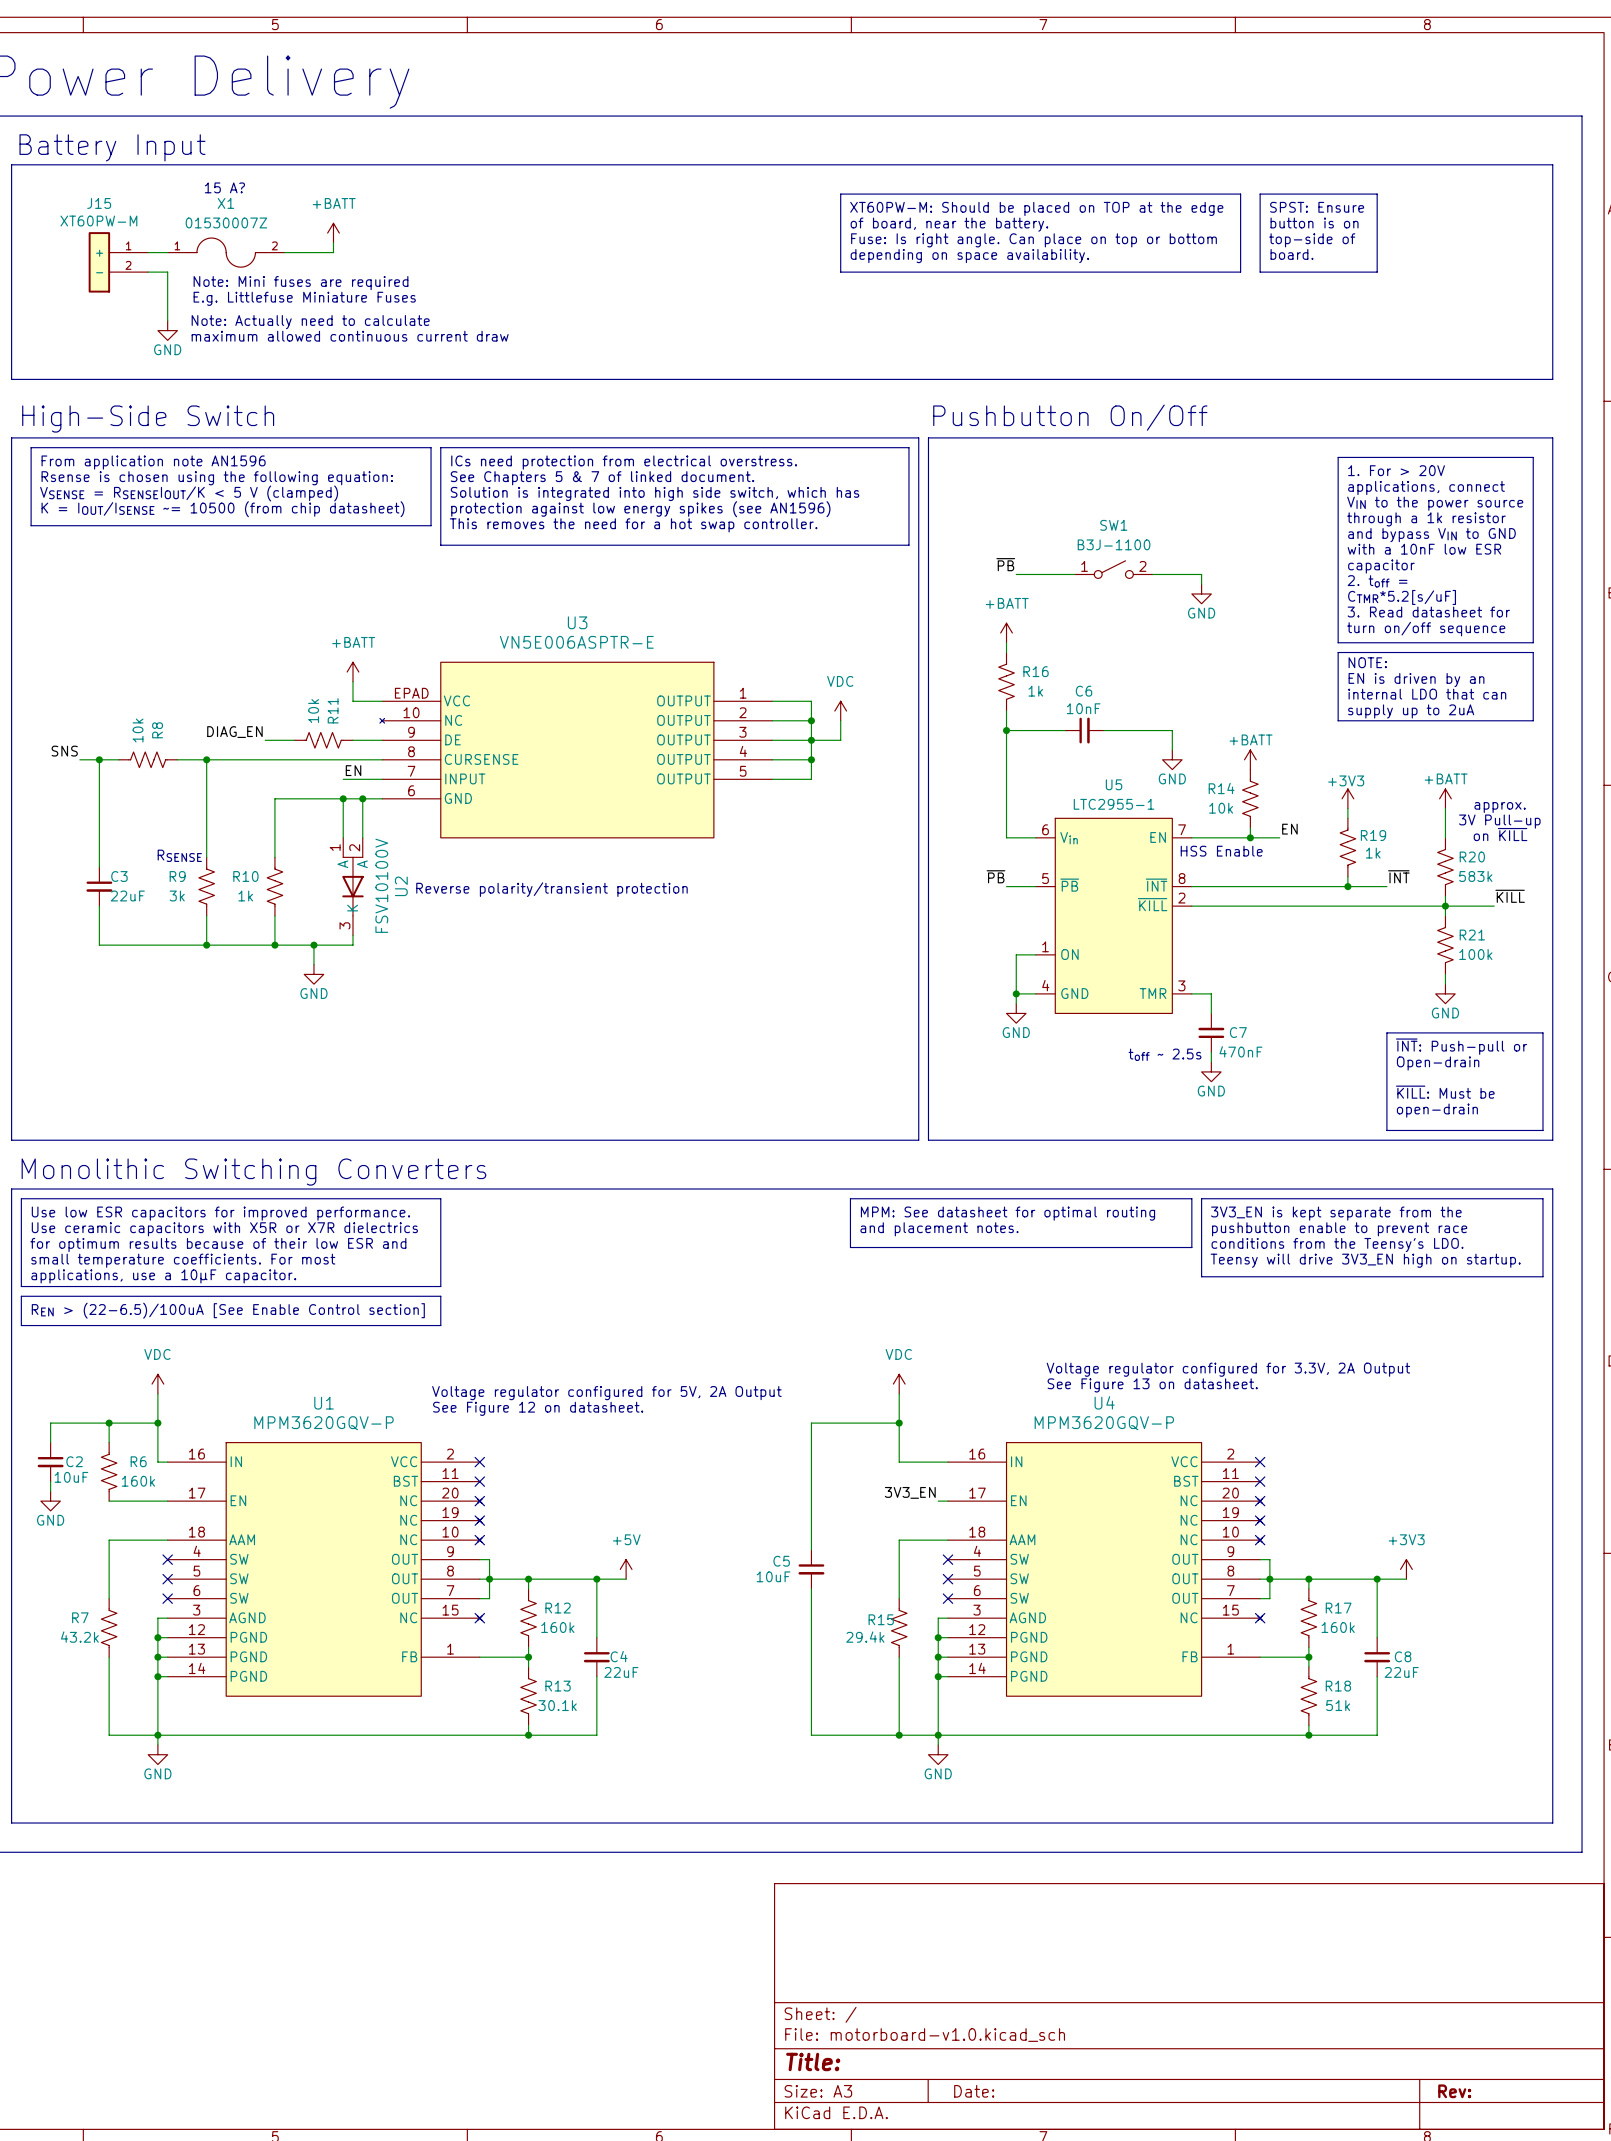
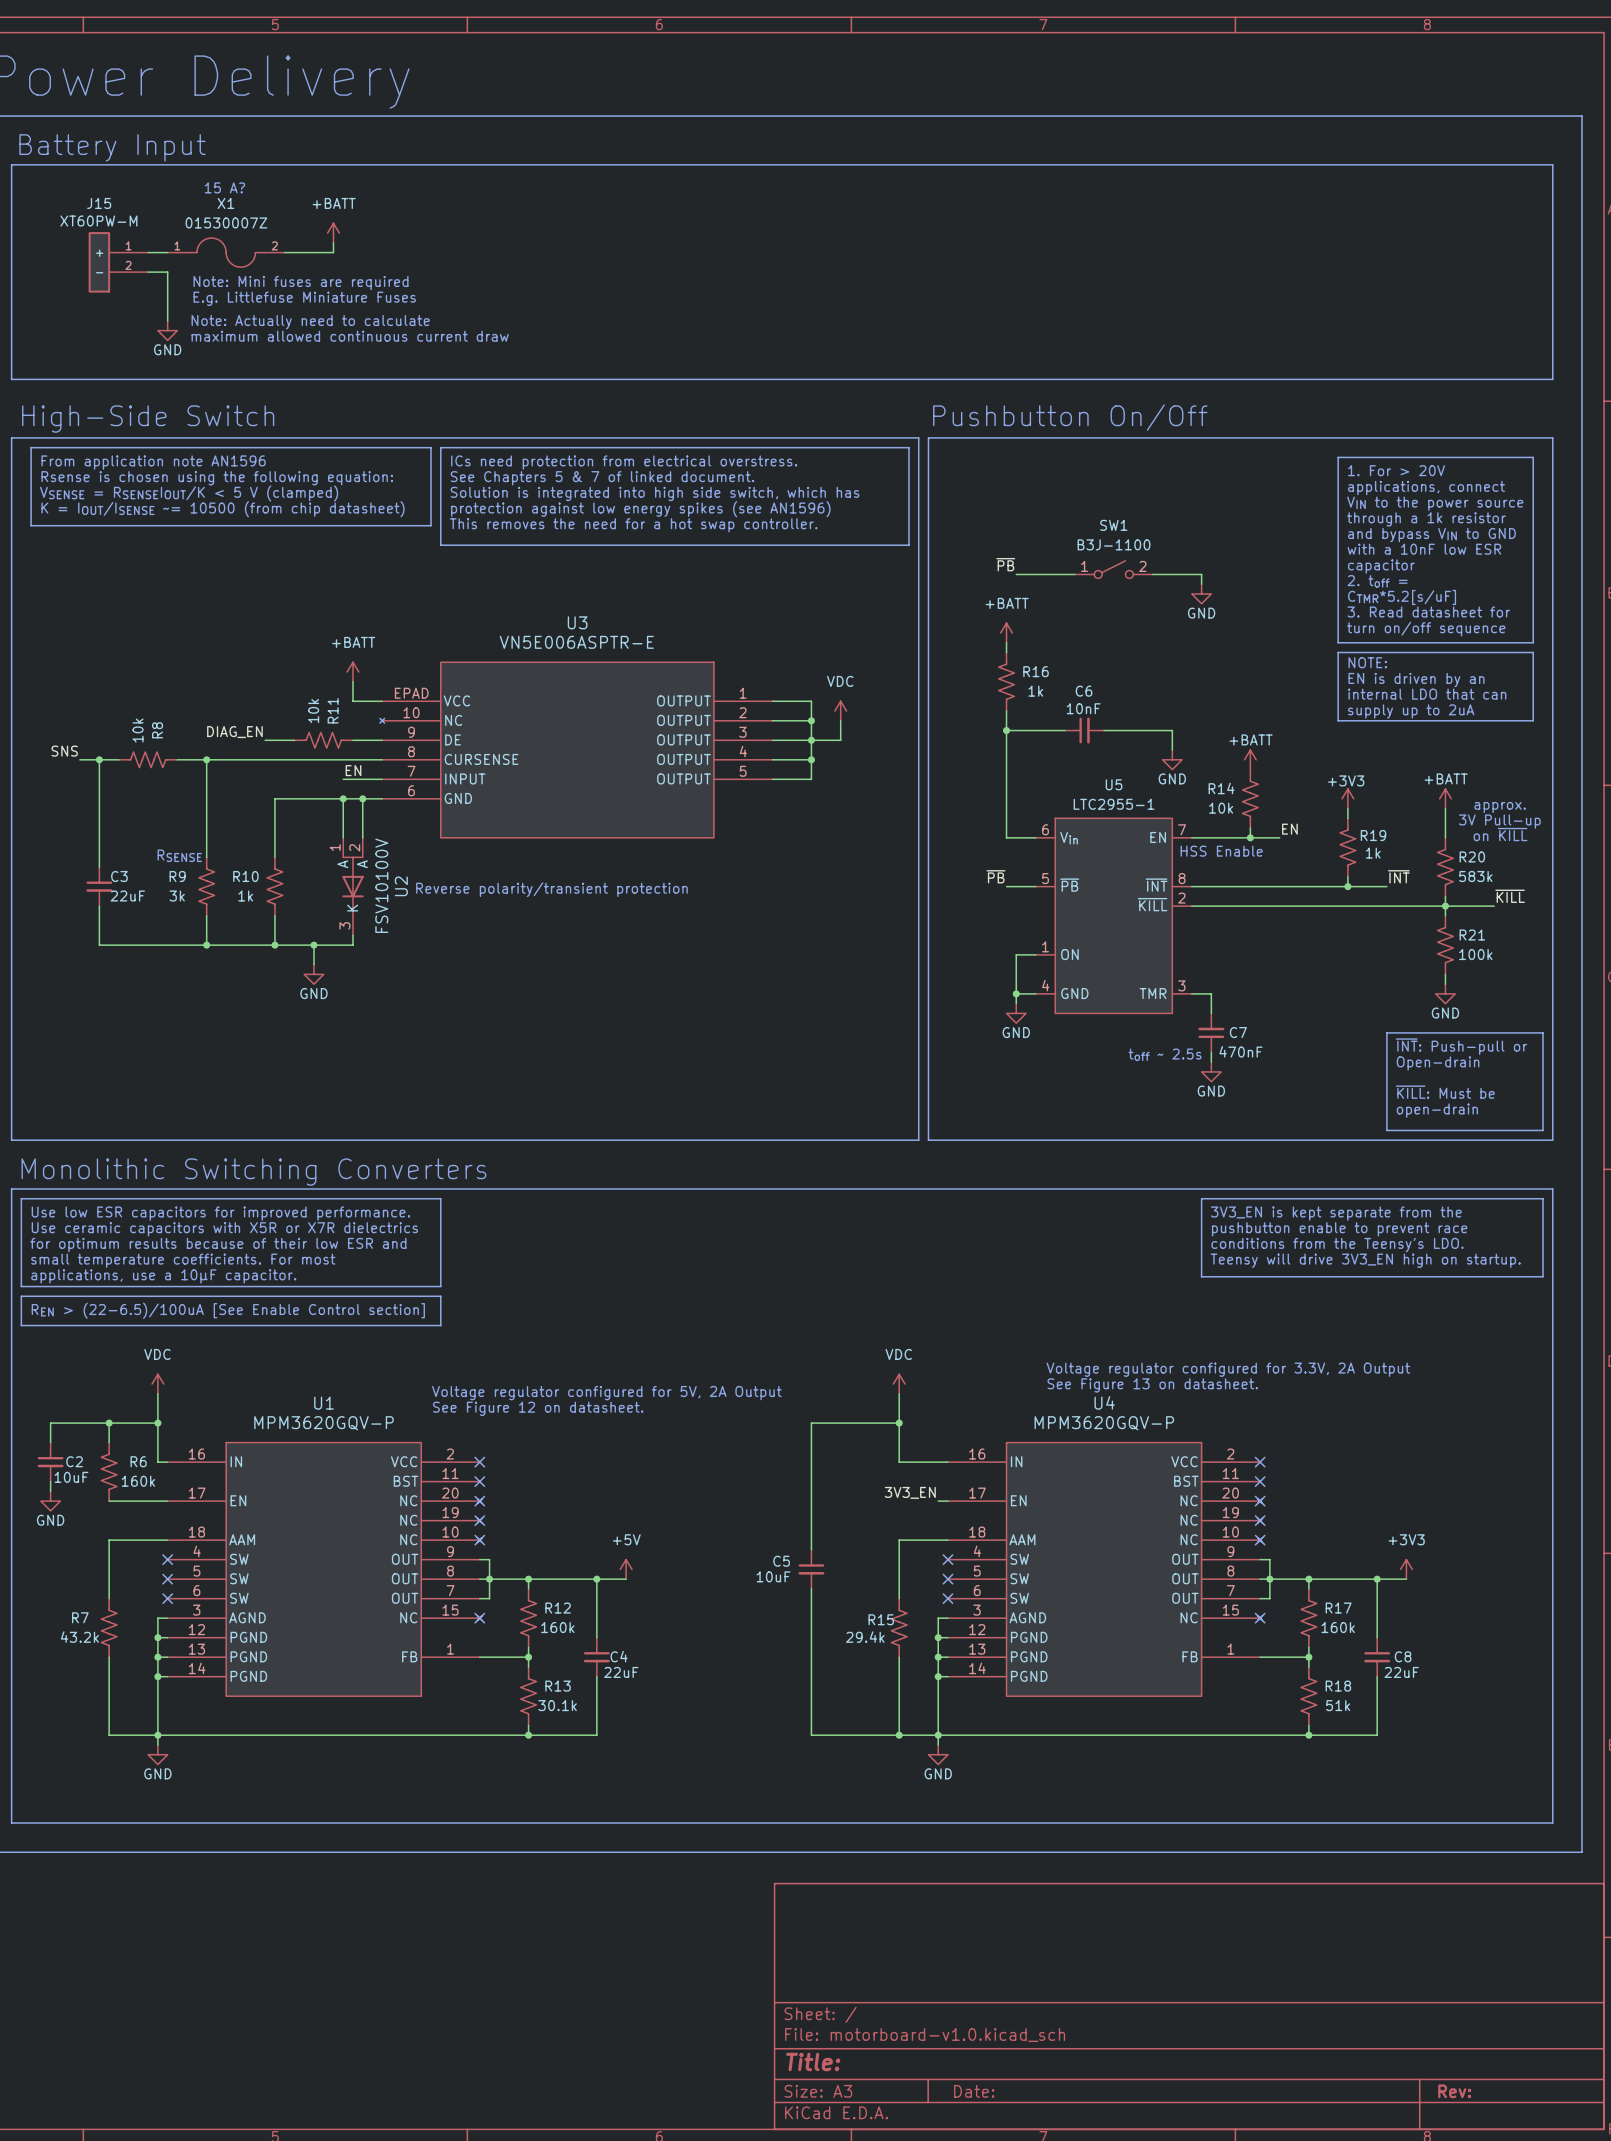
line: (840, 194) (1240, 194) (1240, 272) (840, 272) (840, 194) -> none
line: (1260, 194) (1377, 194) (1377, 272) (1260, 272) (1260, 194) -> none
text: SPST: Ensure (1317, 207) -> none
text: XT60PW-M: Should be placed on TOP at the edge (1036, 208) -> none
text: button is on (1314, 223) -> none
text: of board, near the battery. (949, 224) -> none
text: Fuse: Is right angle. Can place on top or bottom (1034, 240) -> none
text: top-side of (1312, 240) -> none
text: board. (1292, 254) -> none
text: depending on space availability. (969, 256) -> none
line: (850, 1198) (1191, 1198) (1191, 1247) (850, 1247) (850, 1198) -> none
text: MPM: See datasheet for optimal routing (1007, 1213) -> none
text: and placement notes. (939, 1229) -> none

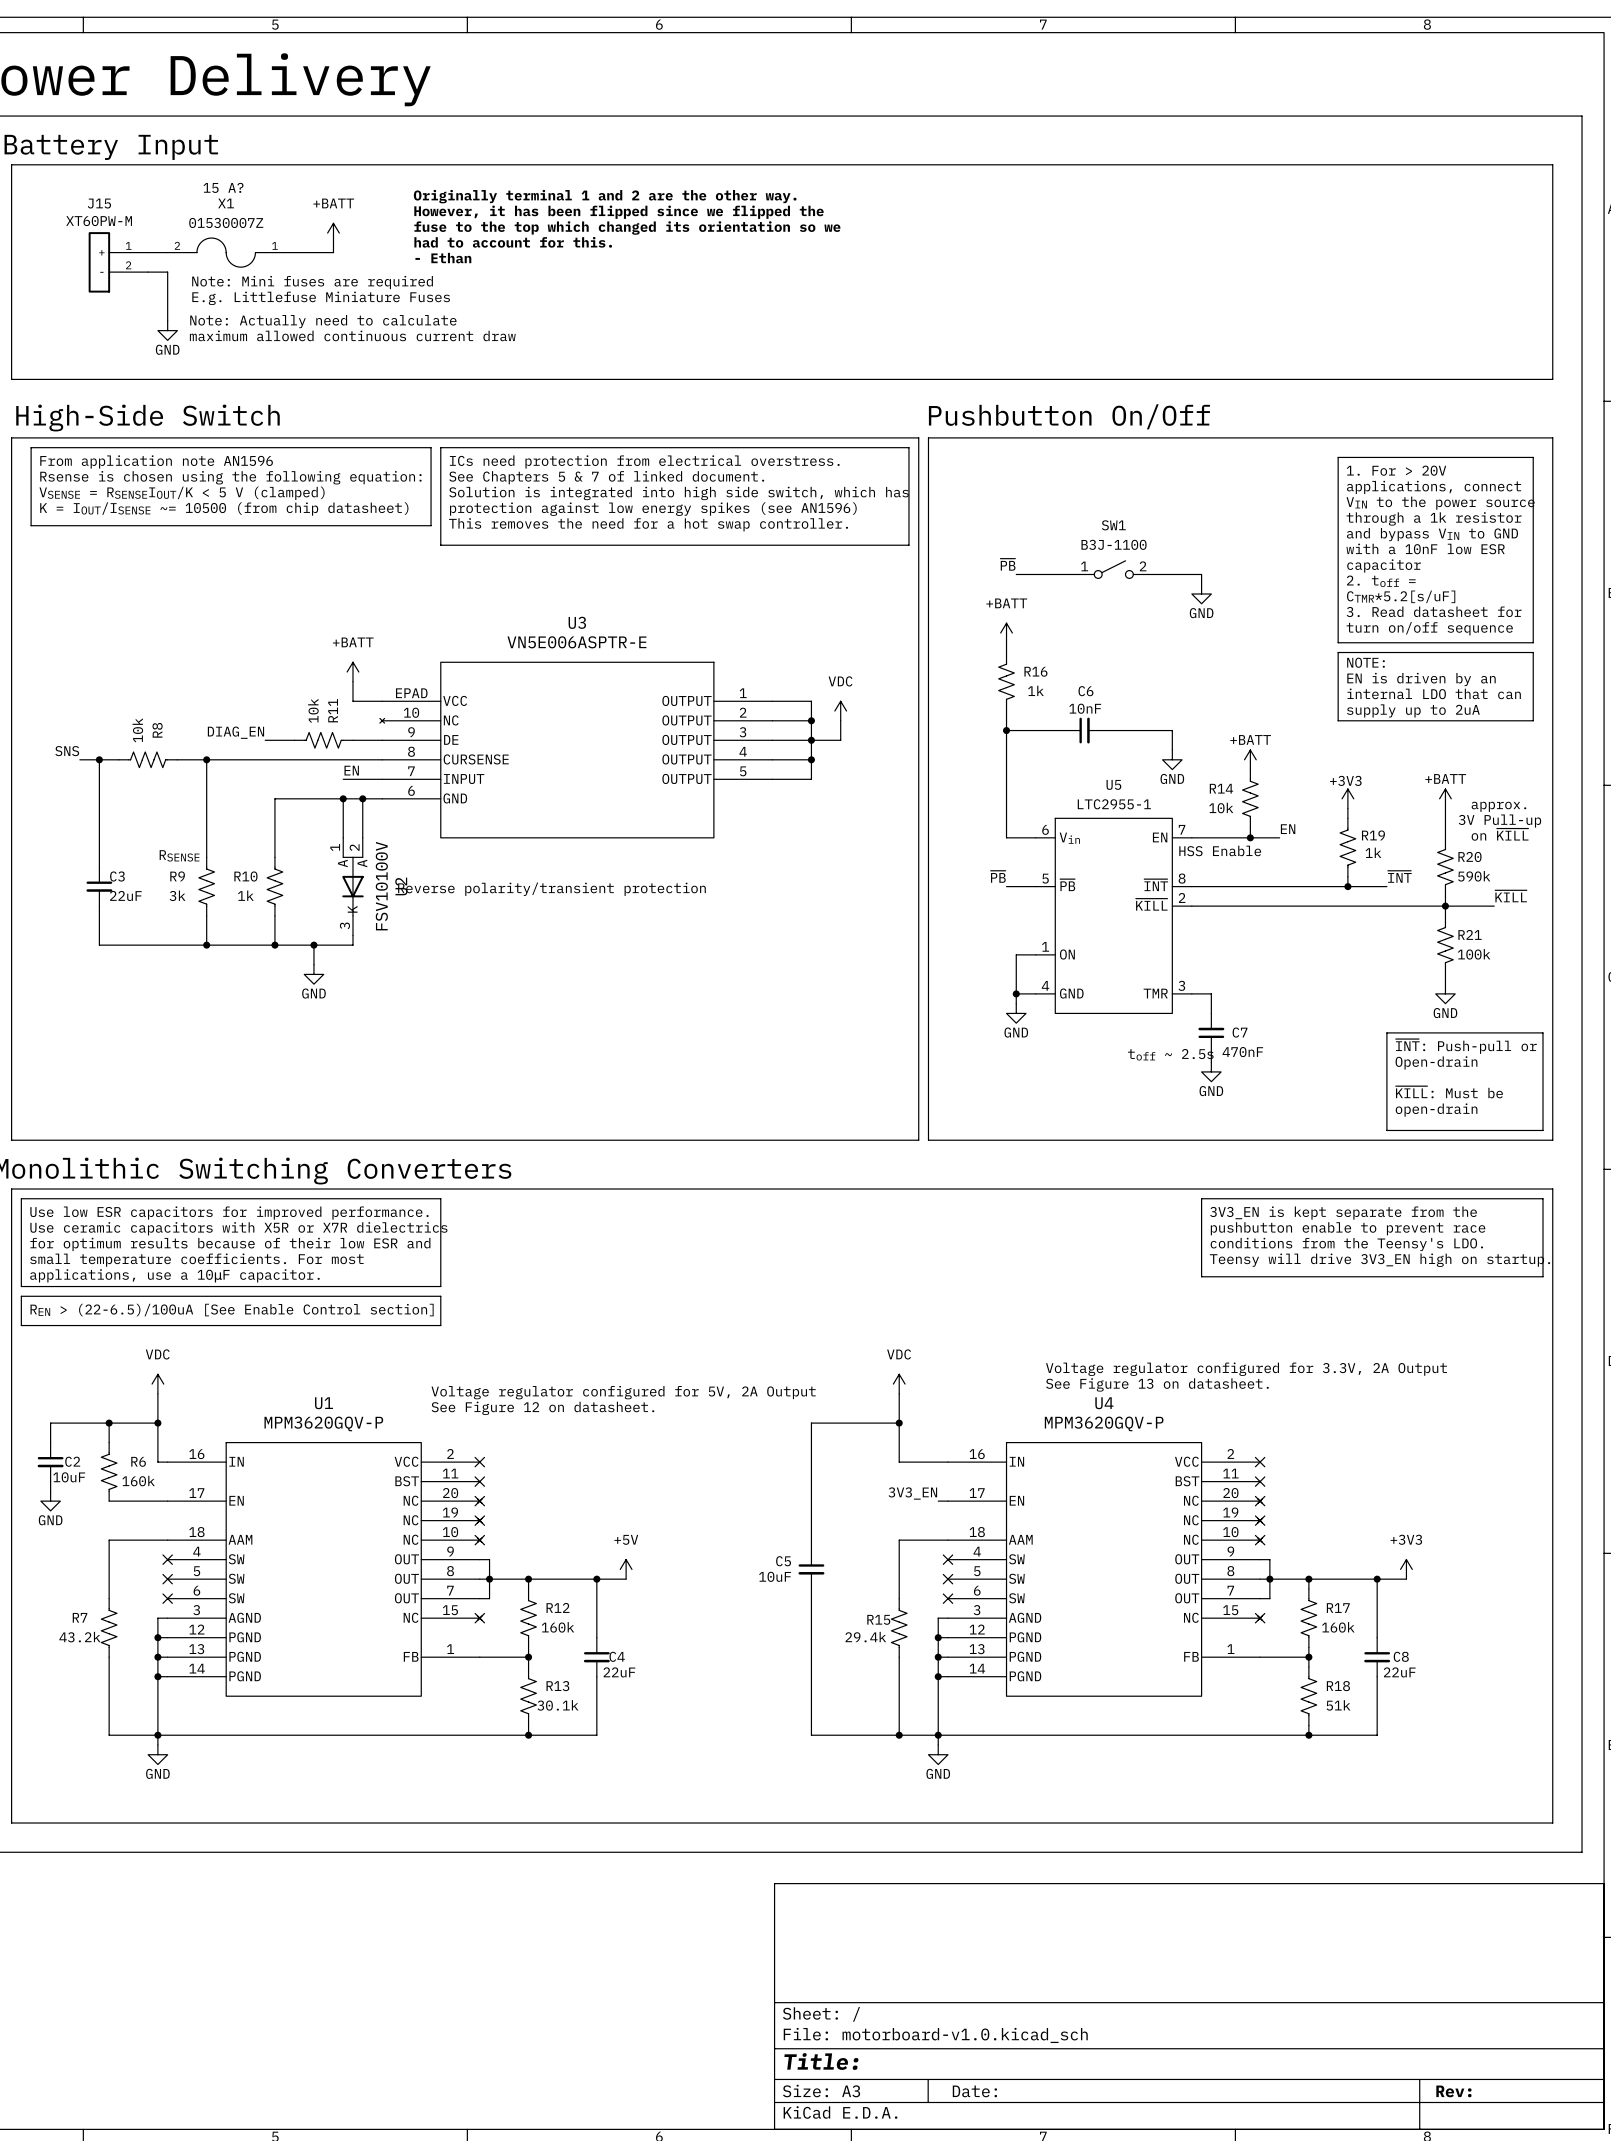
text: none -> Originally terminal 1 and 2 are the other way. (605, 196)
text: none -> However, it has been flipped since we flipped the (618, 212)
text: none -> fuse to the top which changed its orientation so we (627, 228)
text: none -> had to account for this. (513, 242)
X1 rotation: 0° (226, 252) -> 180° (226, 252)
text: none -> - Ethan (443, 258)
R20 value: 583k (1475, 876) -> 590k (1474, 876)

